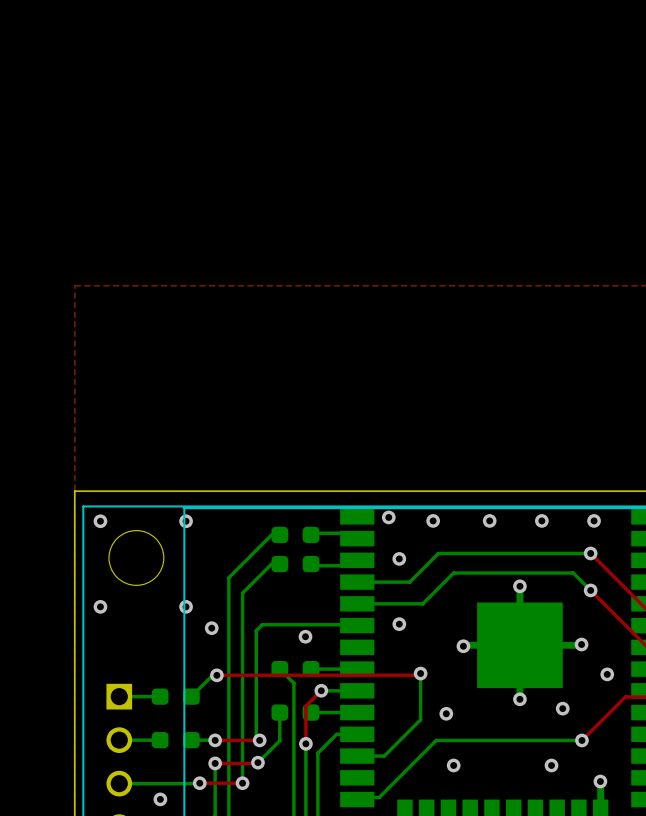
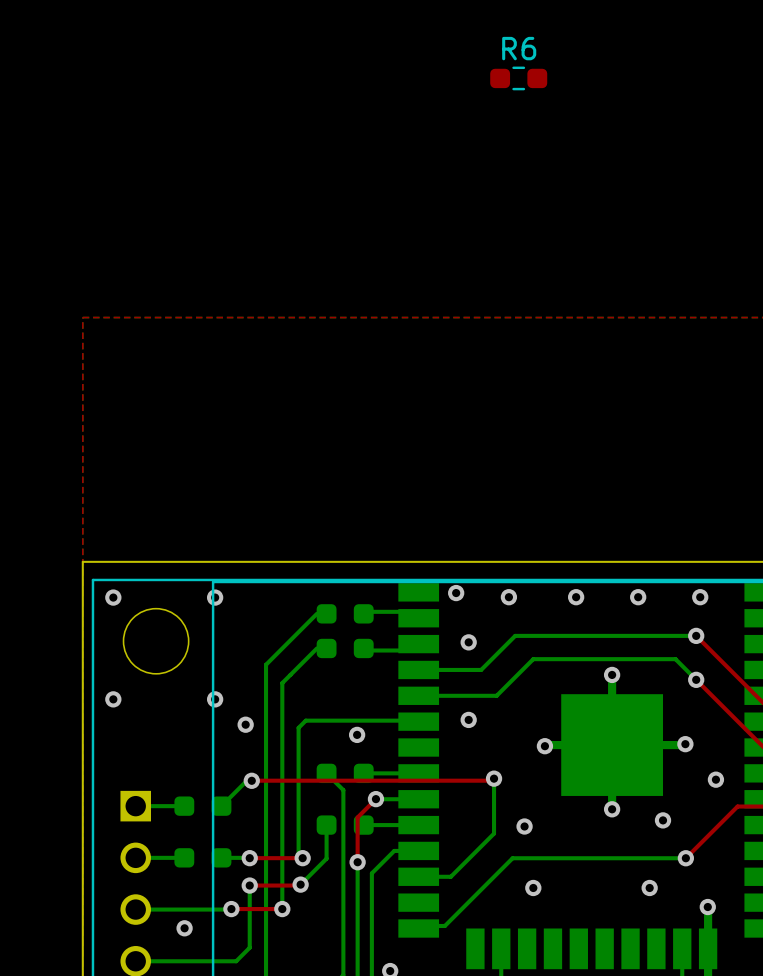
R6: none -> (518, 78)

